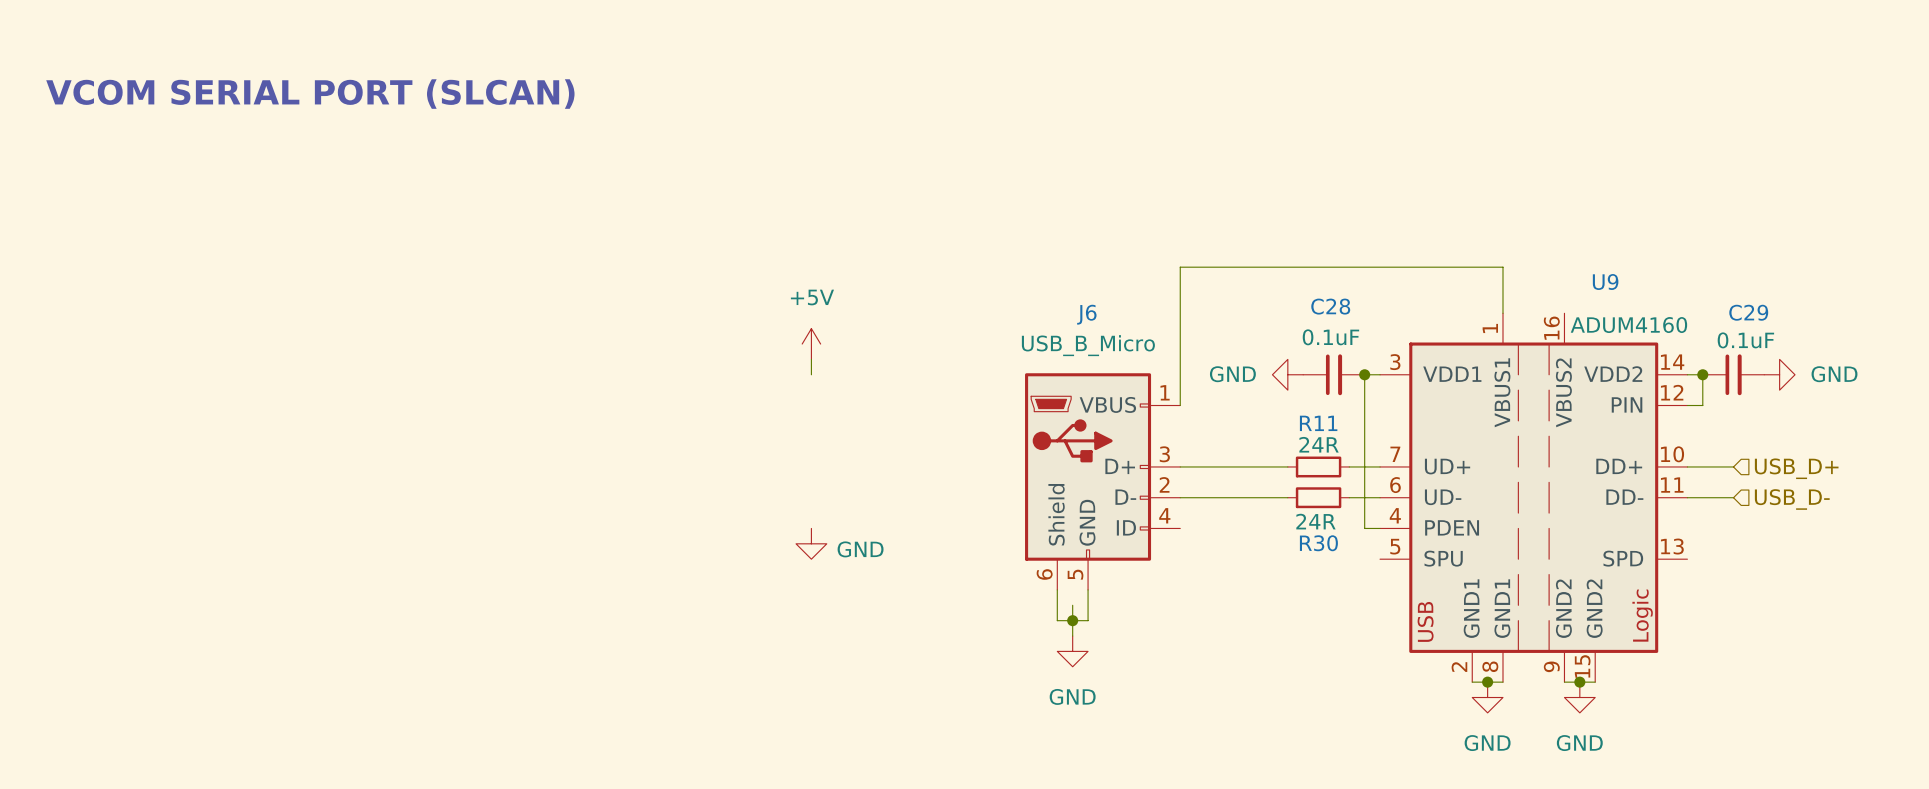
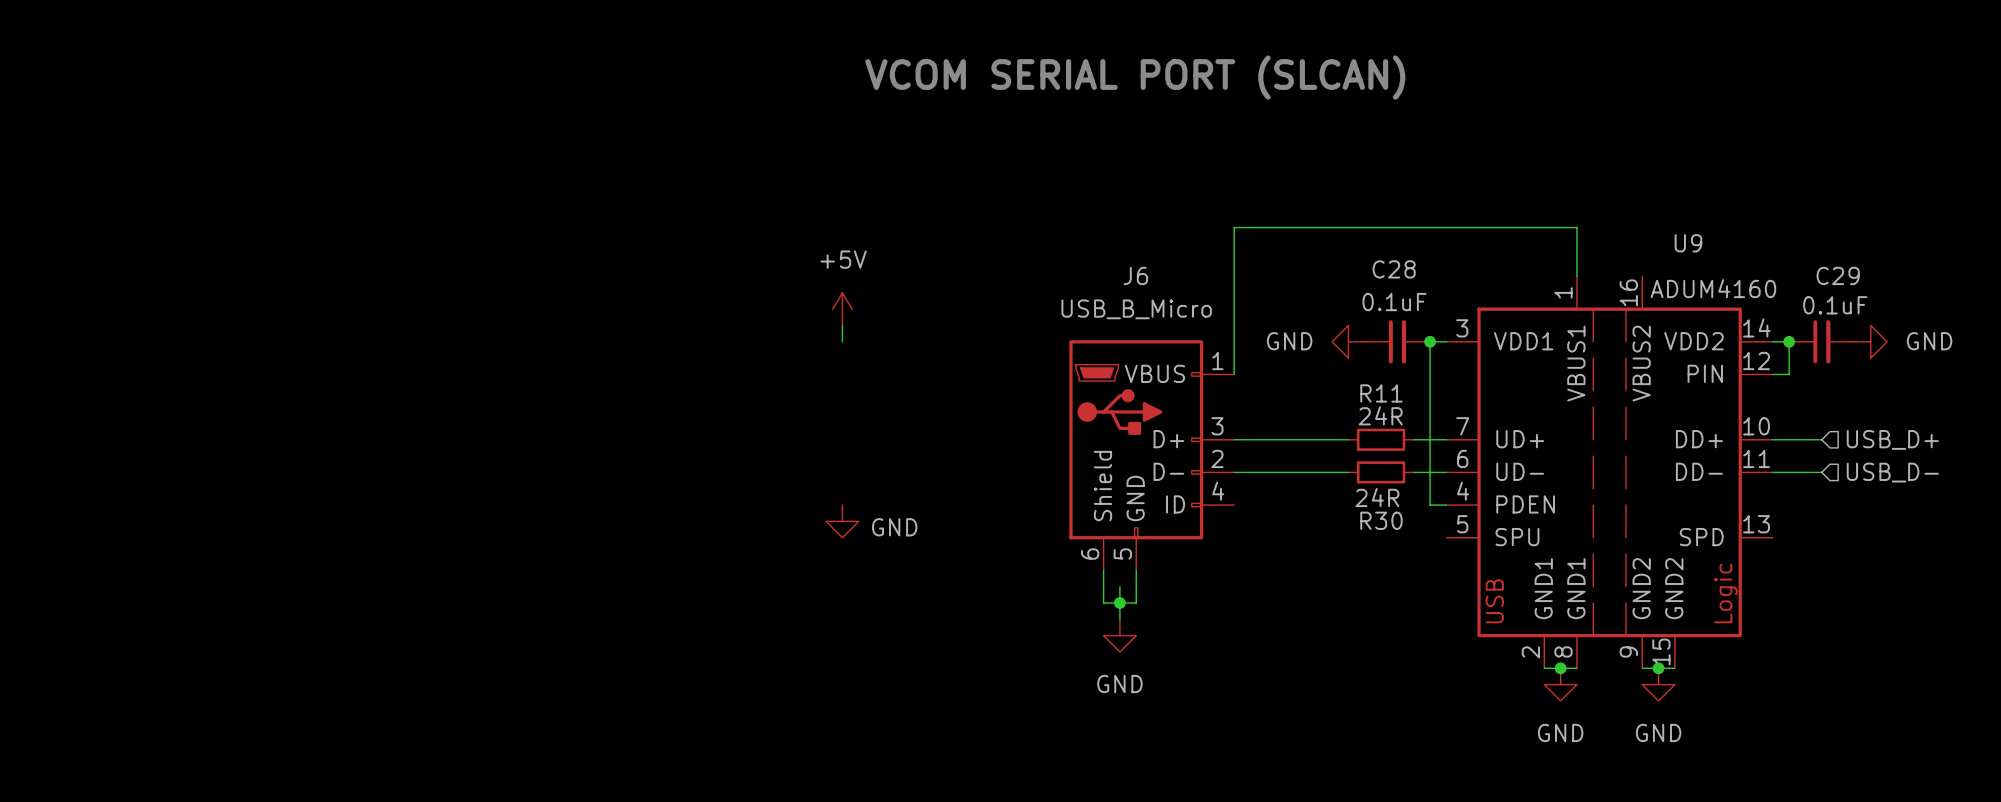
text: VCOM SERIAL PORT (SLCAN) (310, 94) -> none
text: none -> VCOM SERIAL PORT (SLCAN) (1135, 77)

